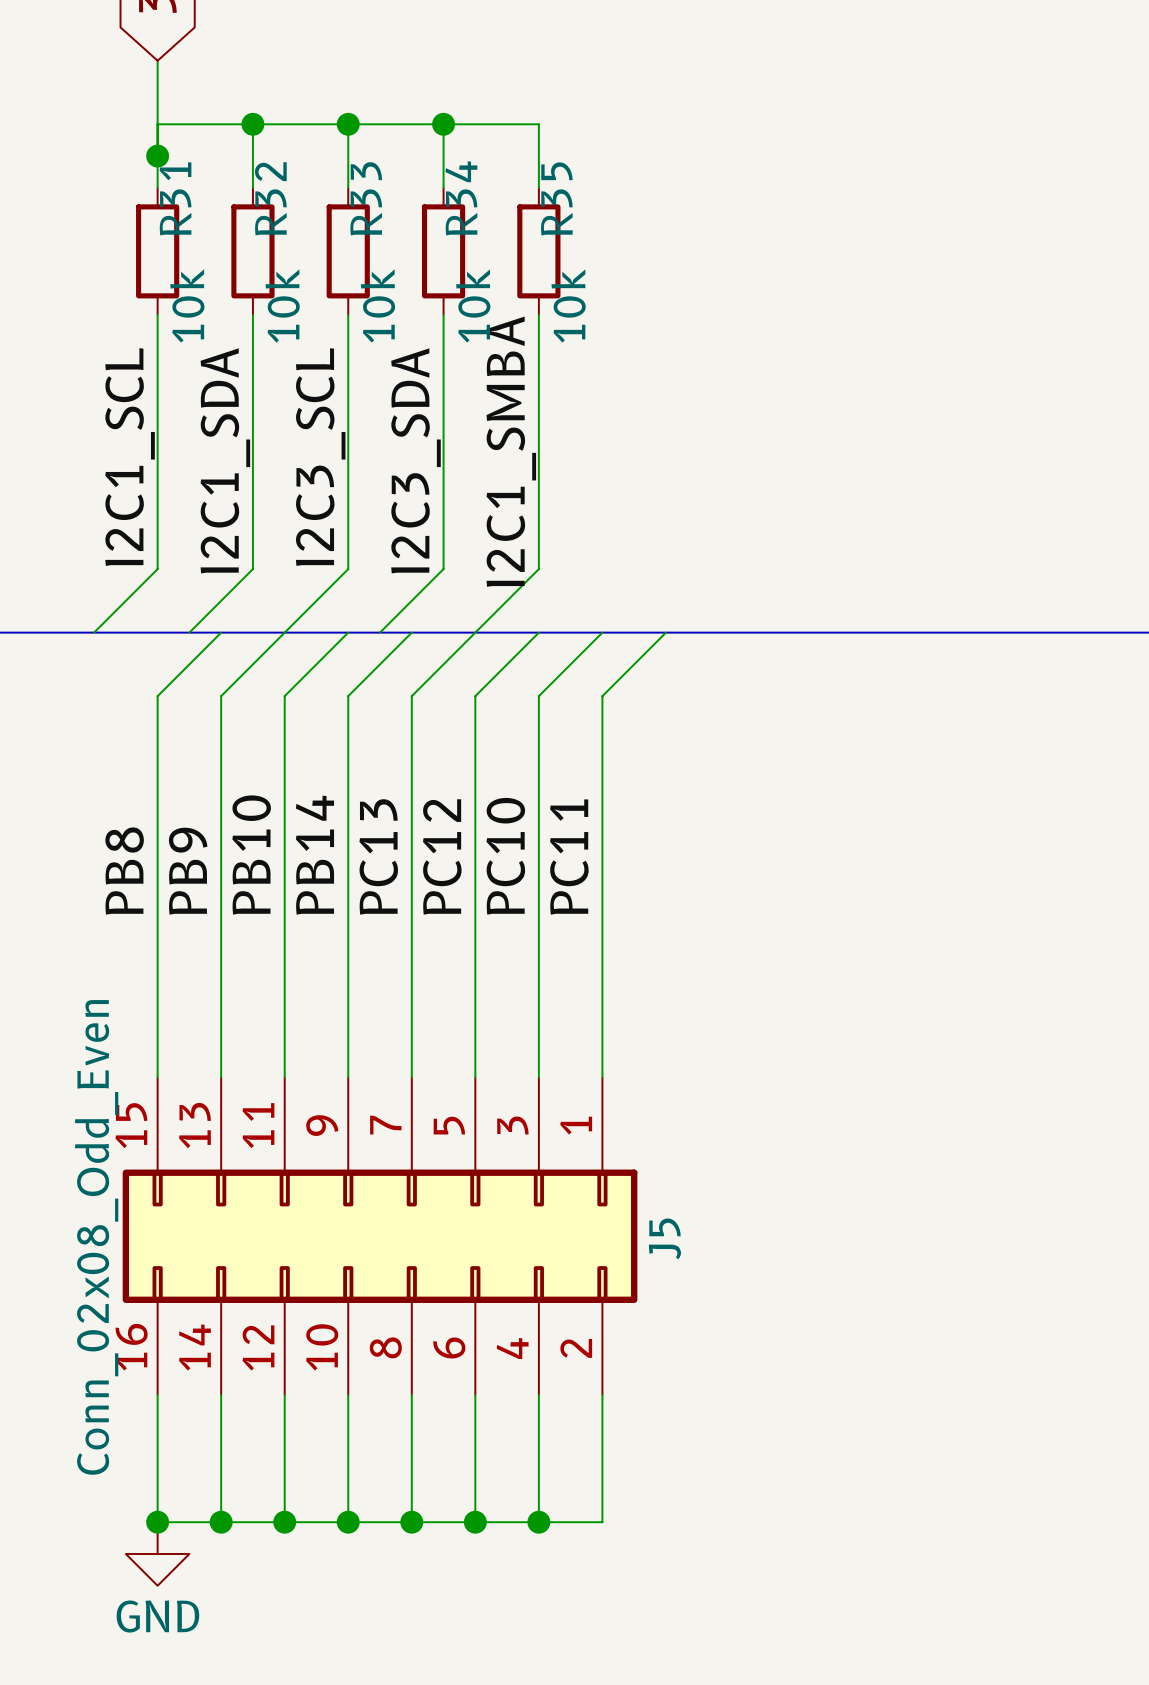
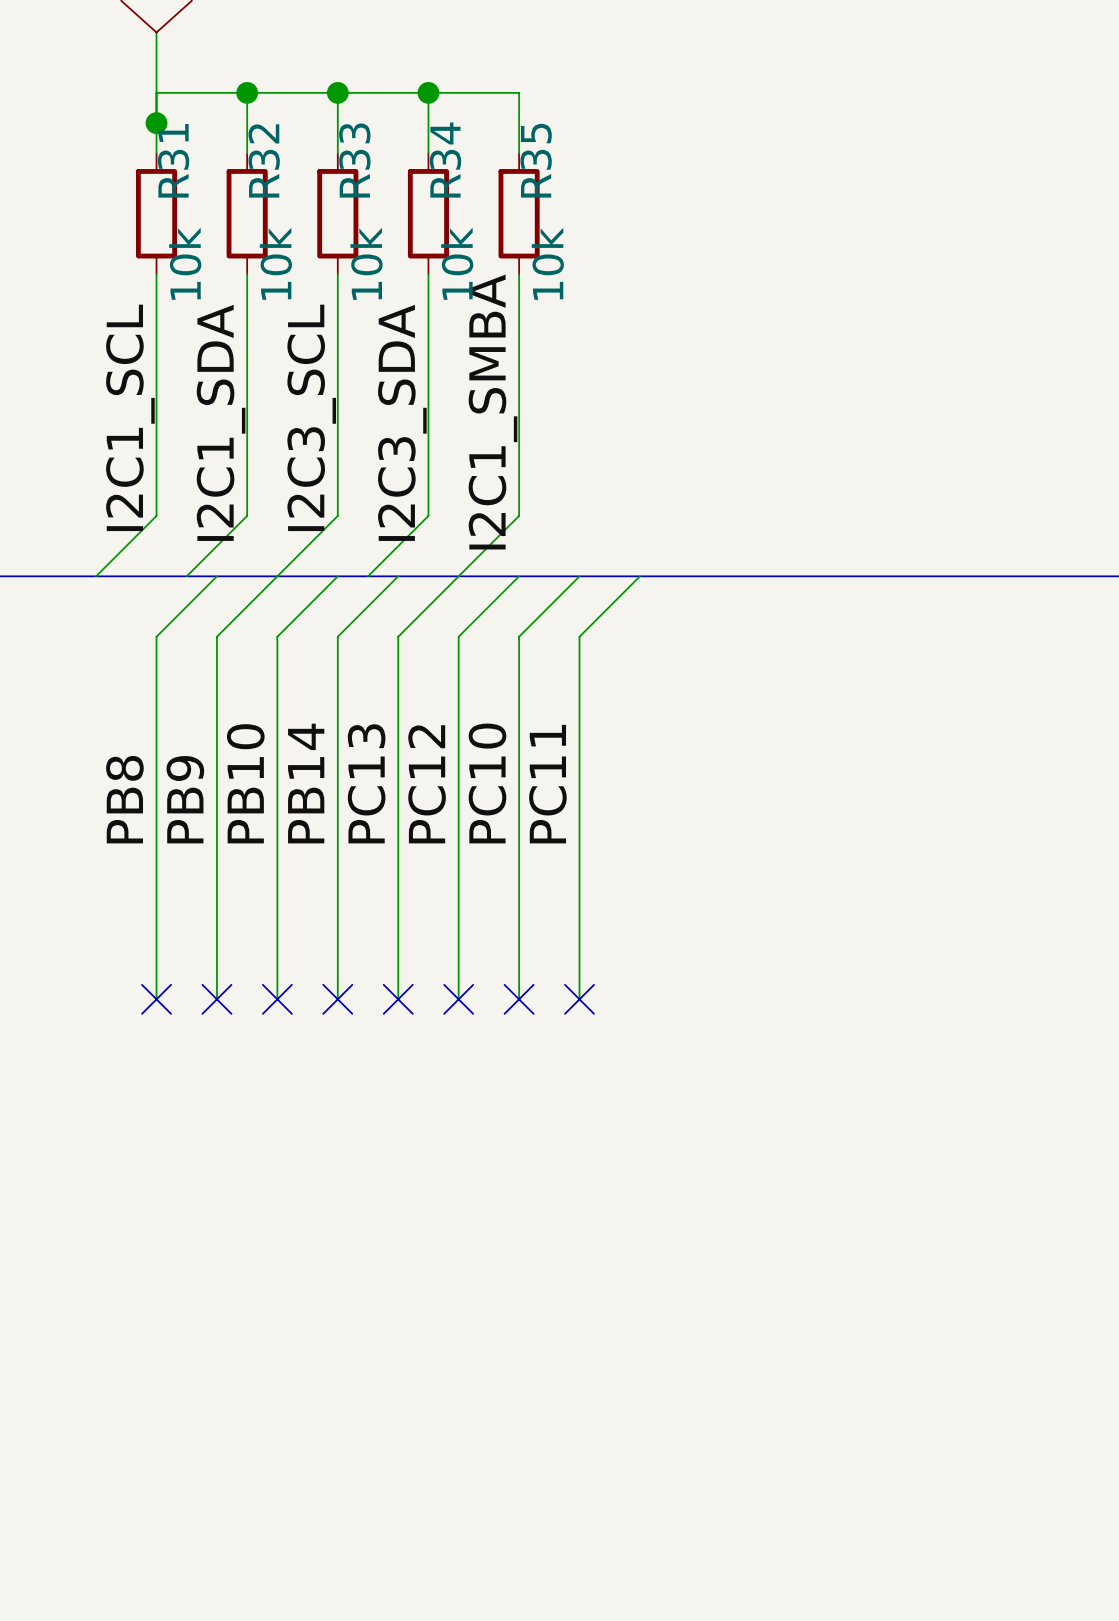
no-connect mark: none -> (156, 999)
no-connect mark: none -> (216, 999)
no-connect mark: none -> (277, 999)
no-connect mark: none -> (337, 999)
no-connect mark: none -> (398, 999)
no-connect mark: none -> (458, 999)
no-connect mark: none -> (519, 999)
no-connect mark: none -> (579, 999)
J5: Conn_02x08_Odd_Even (380, 1236) -> none
wire: (157, 1395) (157, 1522) (602, 1522) (602, 1395) -> none
wire: (221, 1395) (221, 1522) -> none
wire: (284, 1395) (284, 1522) -> none
wire: (348, 1395) (348, 1522) -> none
wire: (411, 1395) (411, 1522) -> none
wire: (475, 1395) (475, 1522) -> none
wire: (538, 1395) (538, 1522) -> none
junction: (157, 1522) -> none
junction: (221, 1522) -> none
junction: (284, 1522) -> none
junction: (348, 1522) -> none
junction: (411, 1522) -> none
junction: (475, 1522) -> none
junction: (538, 1522) -> none
power symbol: GND (157, 1553) -> none

